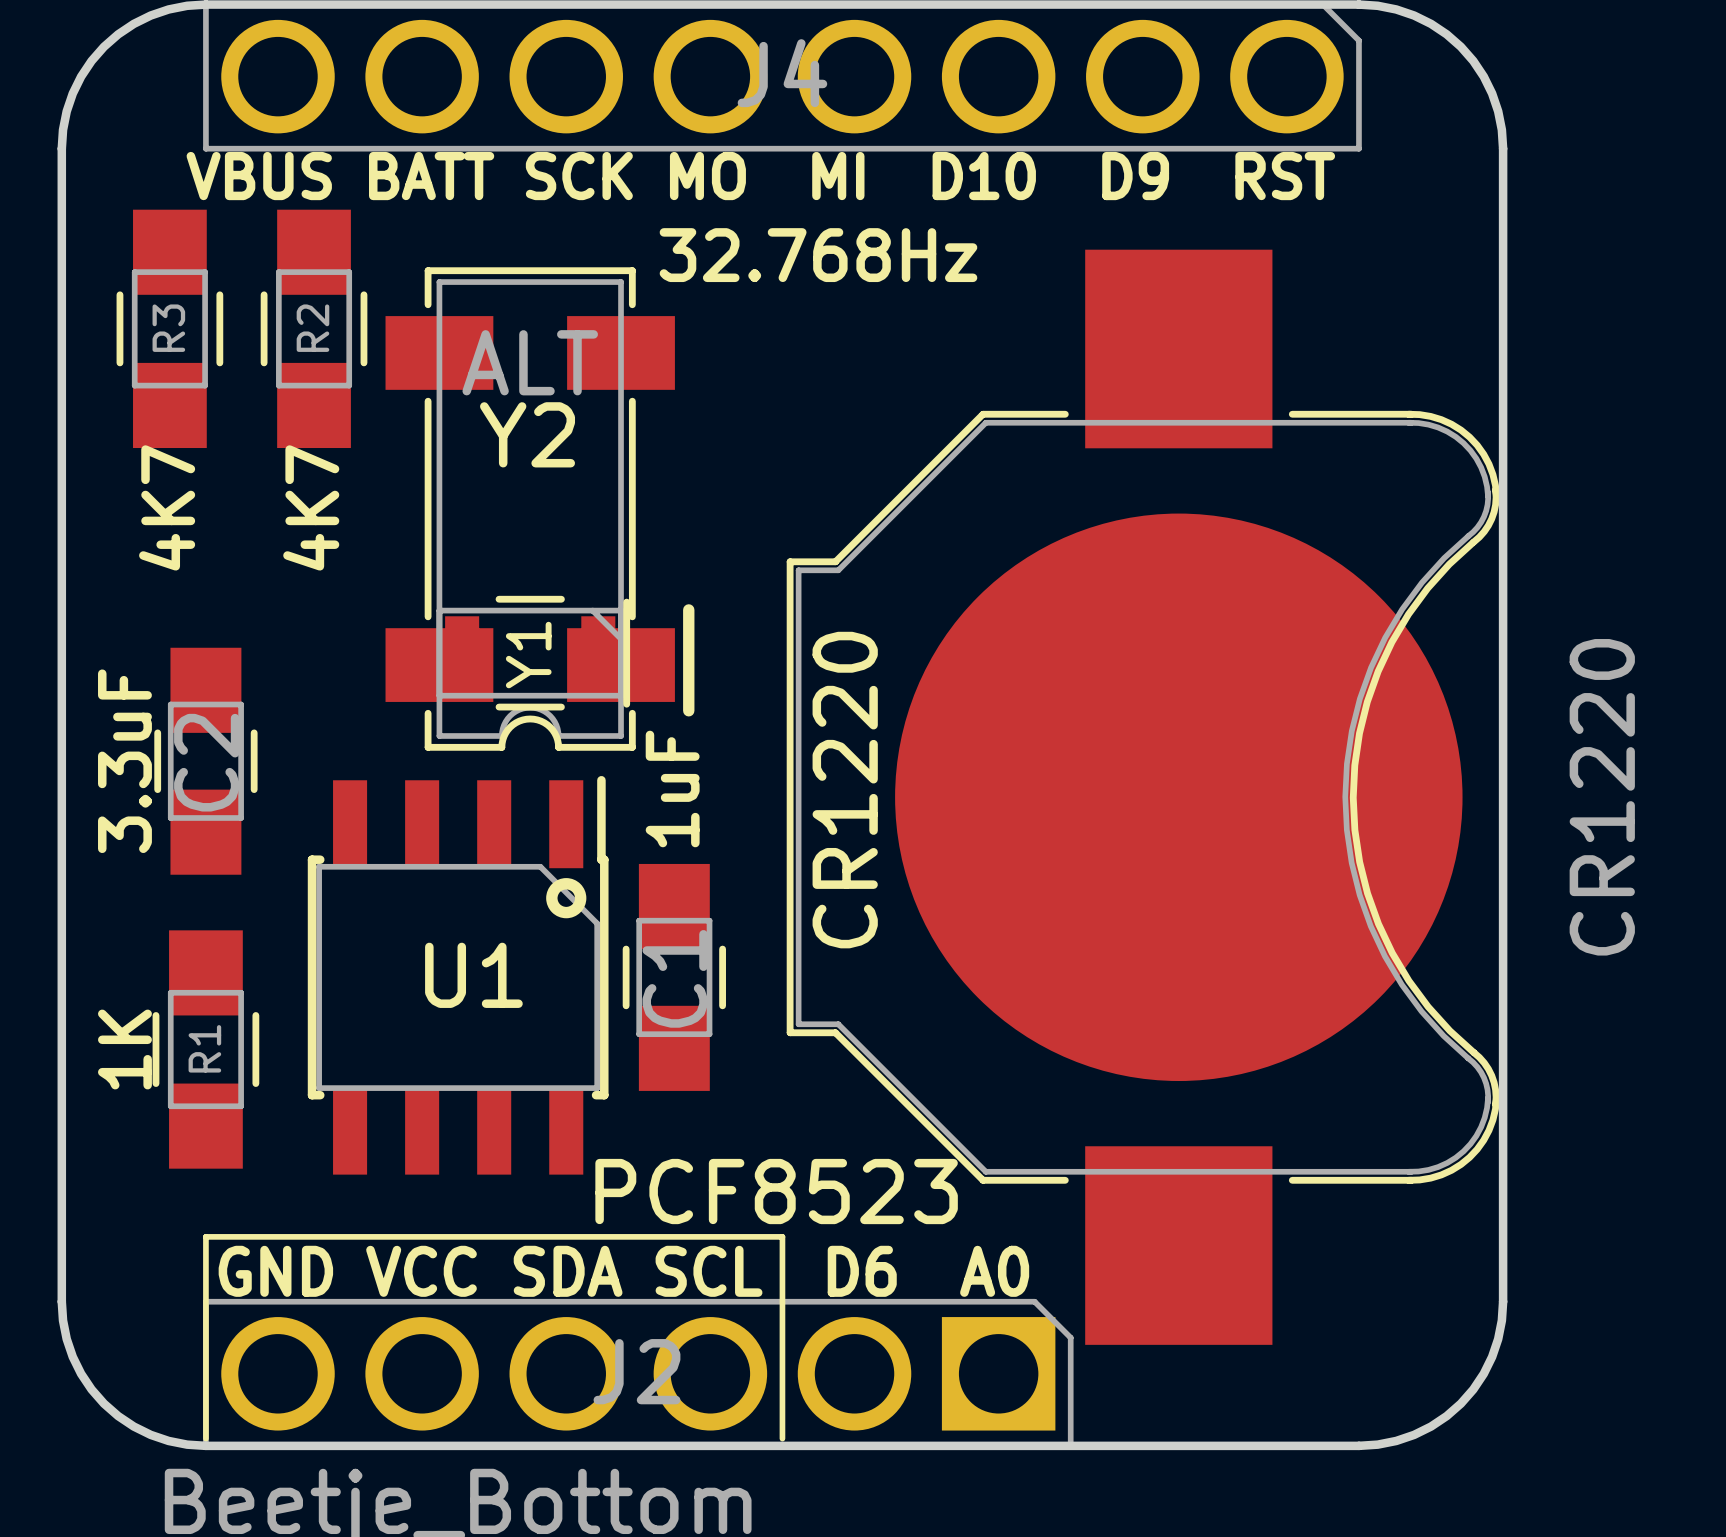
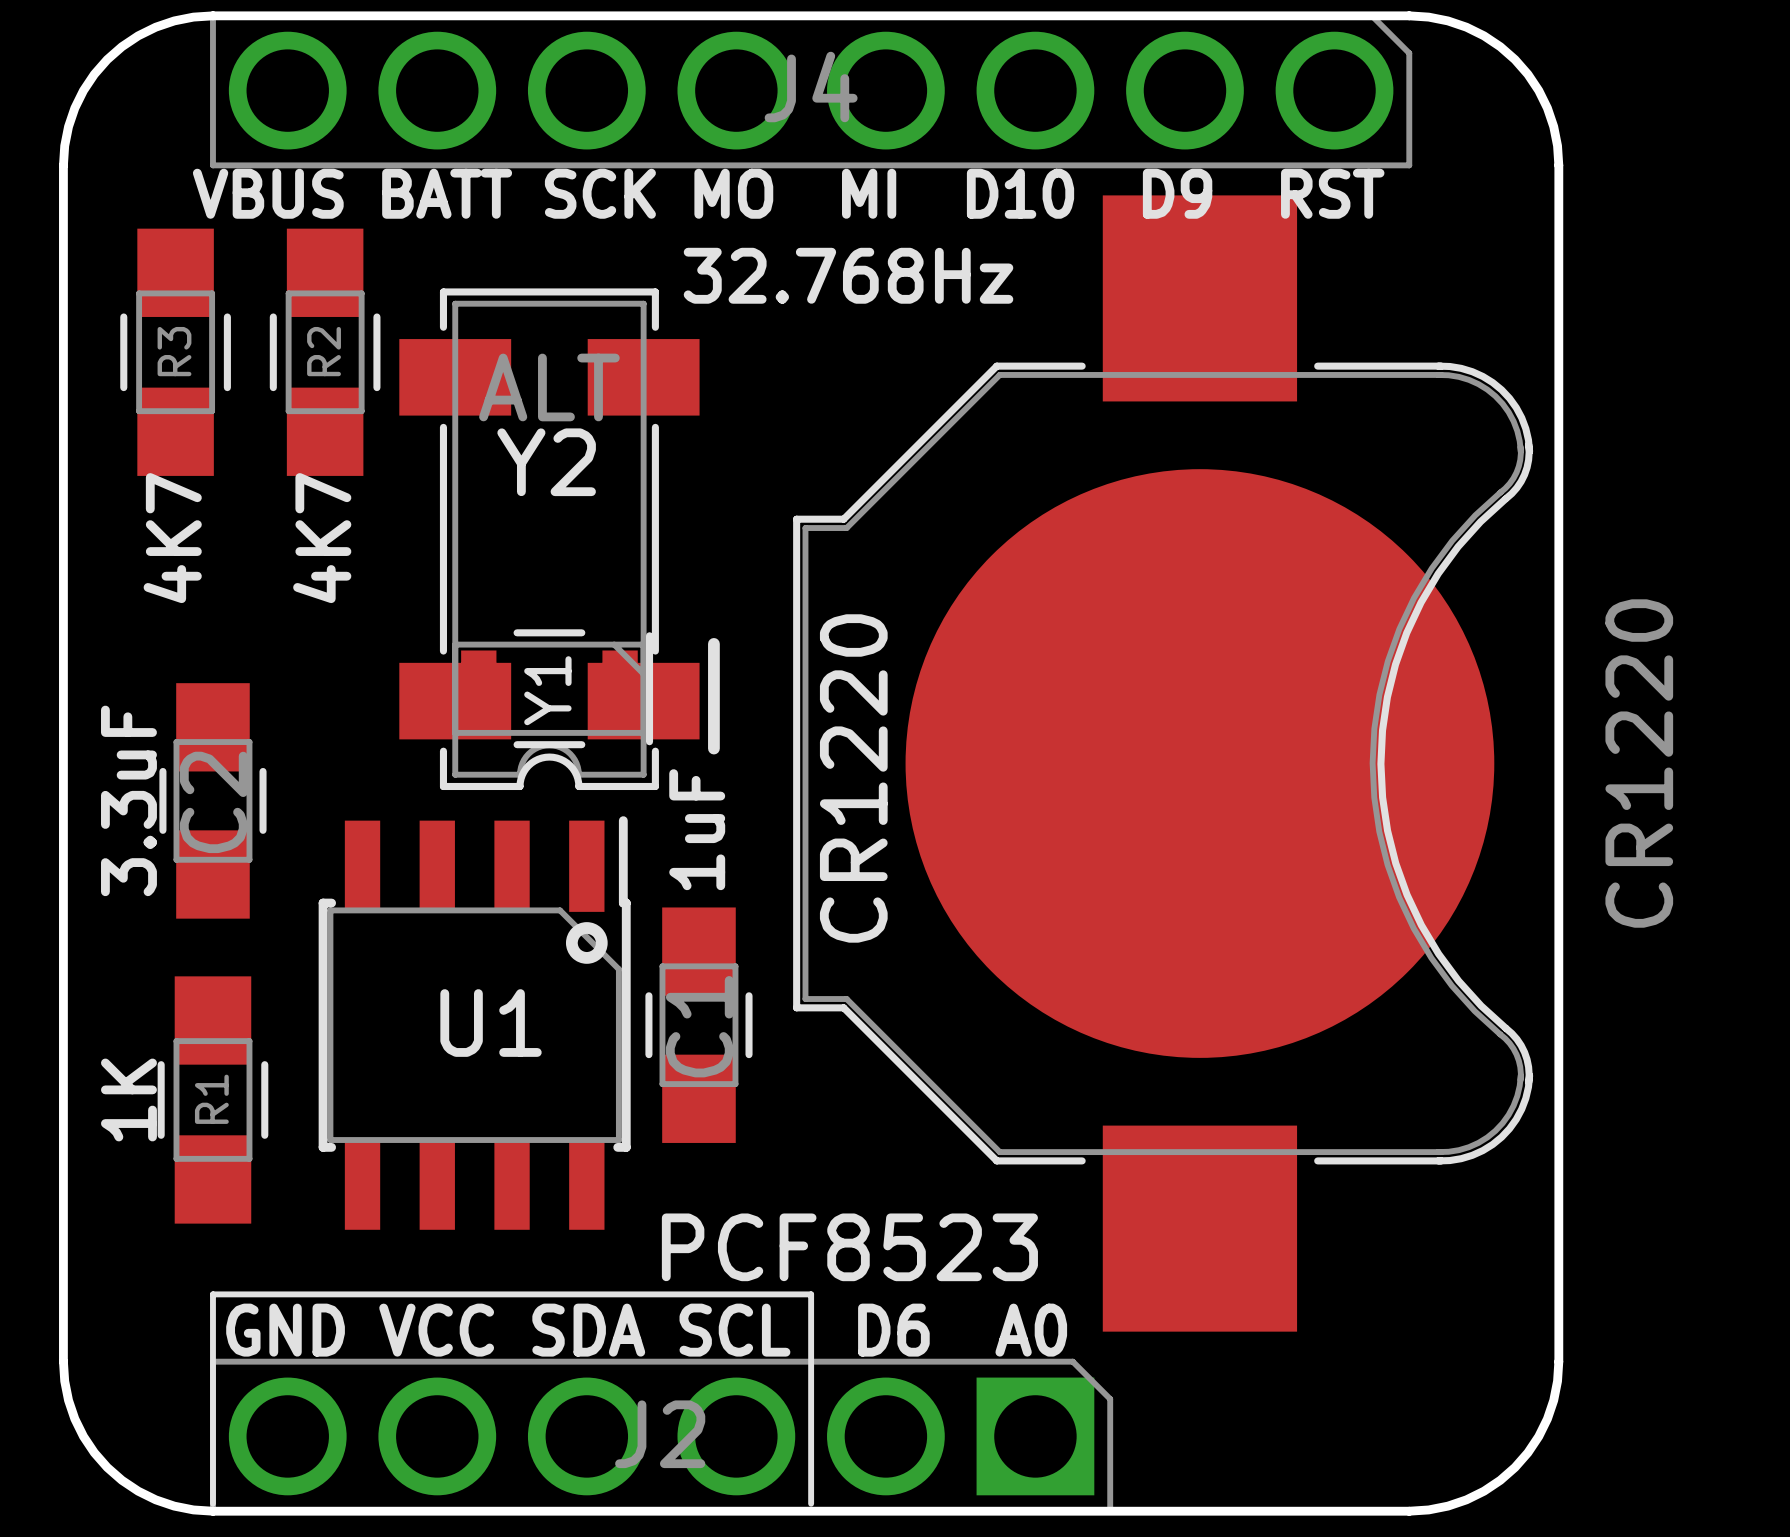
text position: CR1220 (845, 790) -> CR1220 (853, 778)
part position: (1143, 797) -> (1163, 763)
U1 value position: PCF8523 (776, 1191) -> PCF8523 (849, 1247)

